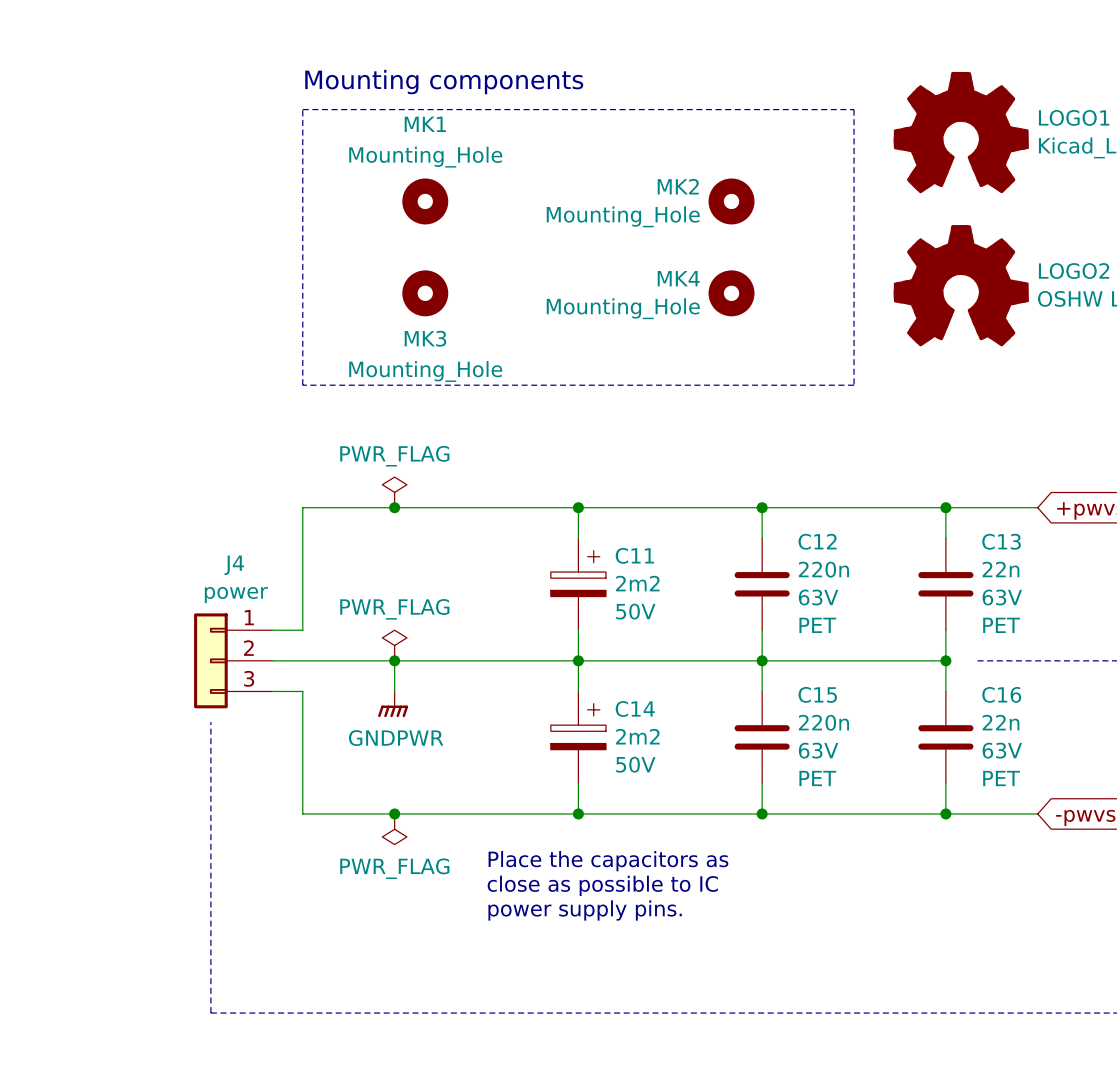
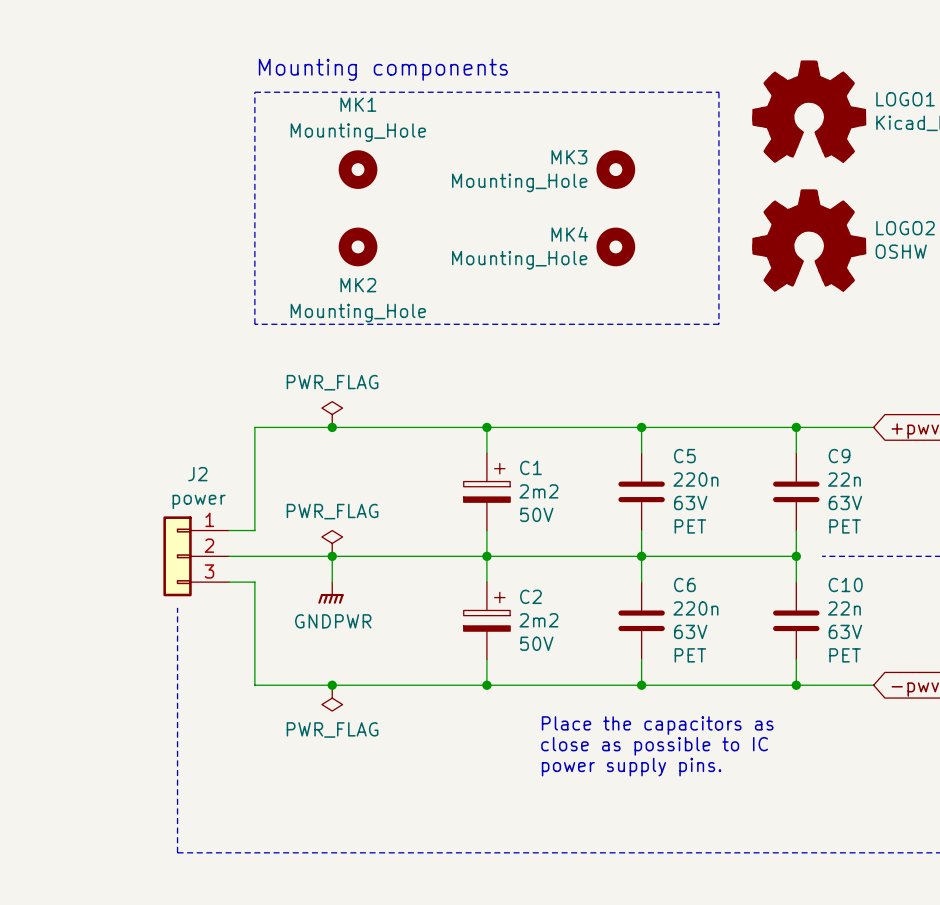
MK2 name: MK2 (678, 186) -> MK3 (569, 157)
MK3 name: MK3 (425, 338) -> MK2 (358, 285)
C12 name: C12 (817, 541) -> C5 (684, 456)
C13 name: C13 (1001, 541) -> C9 (839, 456)
C11 name: C11 (634, 555) -> C1 (530, 467)
J4 name: J4 (234, 565) -> J2 (197, 474)
C15 name: C15 (817, 694) -> C6 (684, 584)
C16 name: C16 (1001, 694) -> C10 (845, 584)
C14 name: C14 (635, 708) -> C2 (530, 596)
text position: Place the capacitors as (608, 861) -> Place the capacitors as (657, 725)
text position: close as possible to IC (602, 885) -> close as possible to IC (654, 746)
text position: power supply pins. (585, 910) -> power supply pins. (631, 767)

